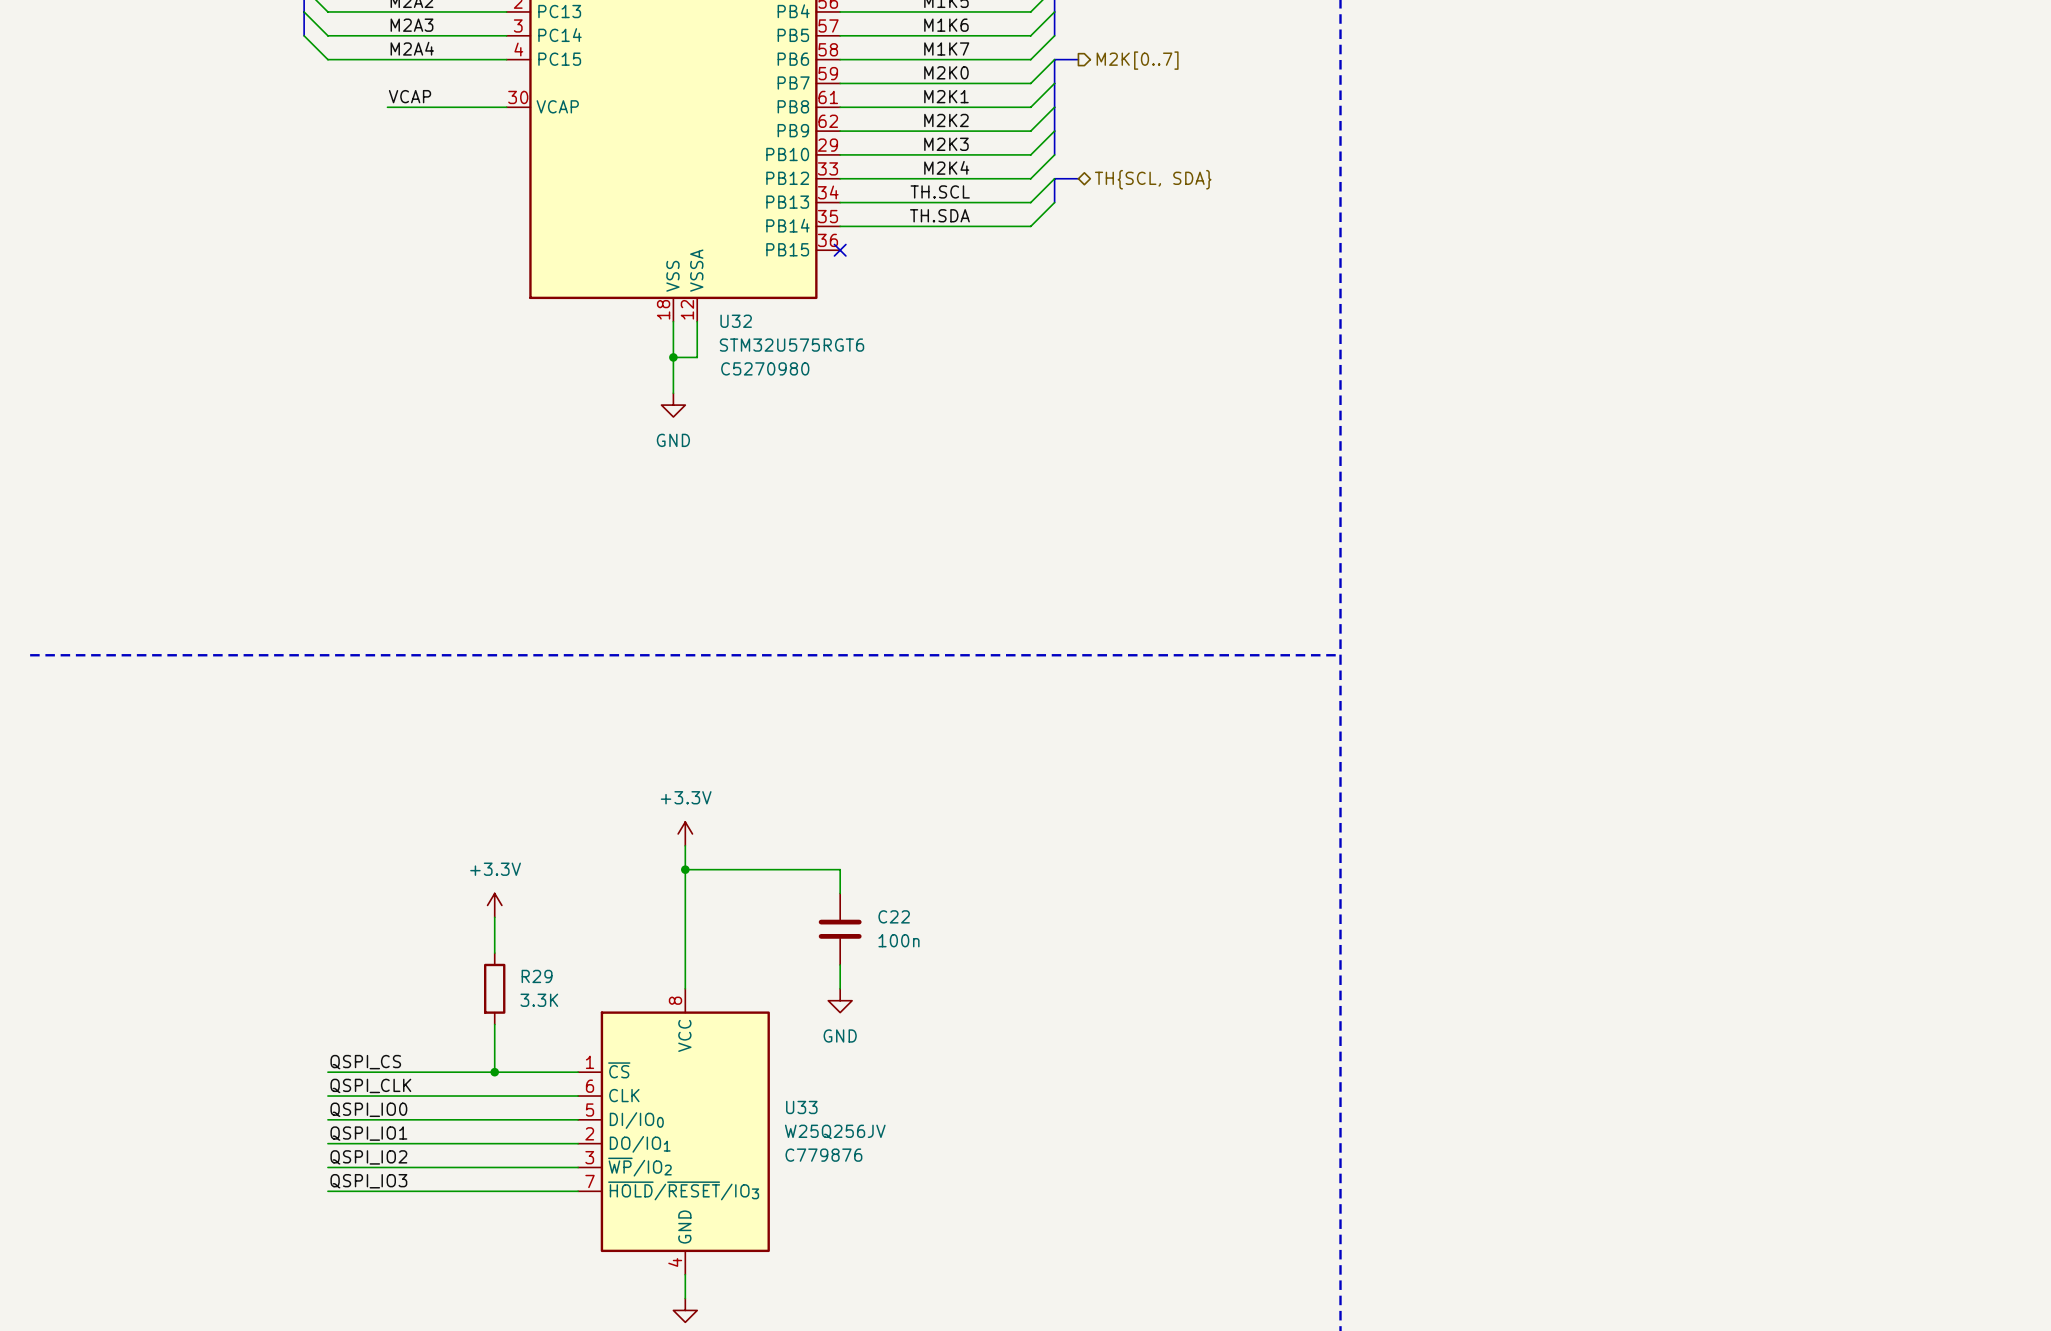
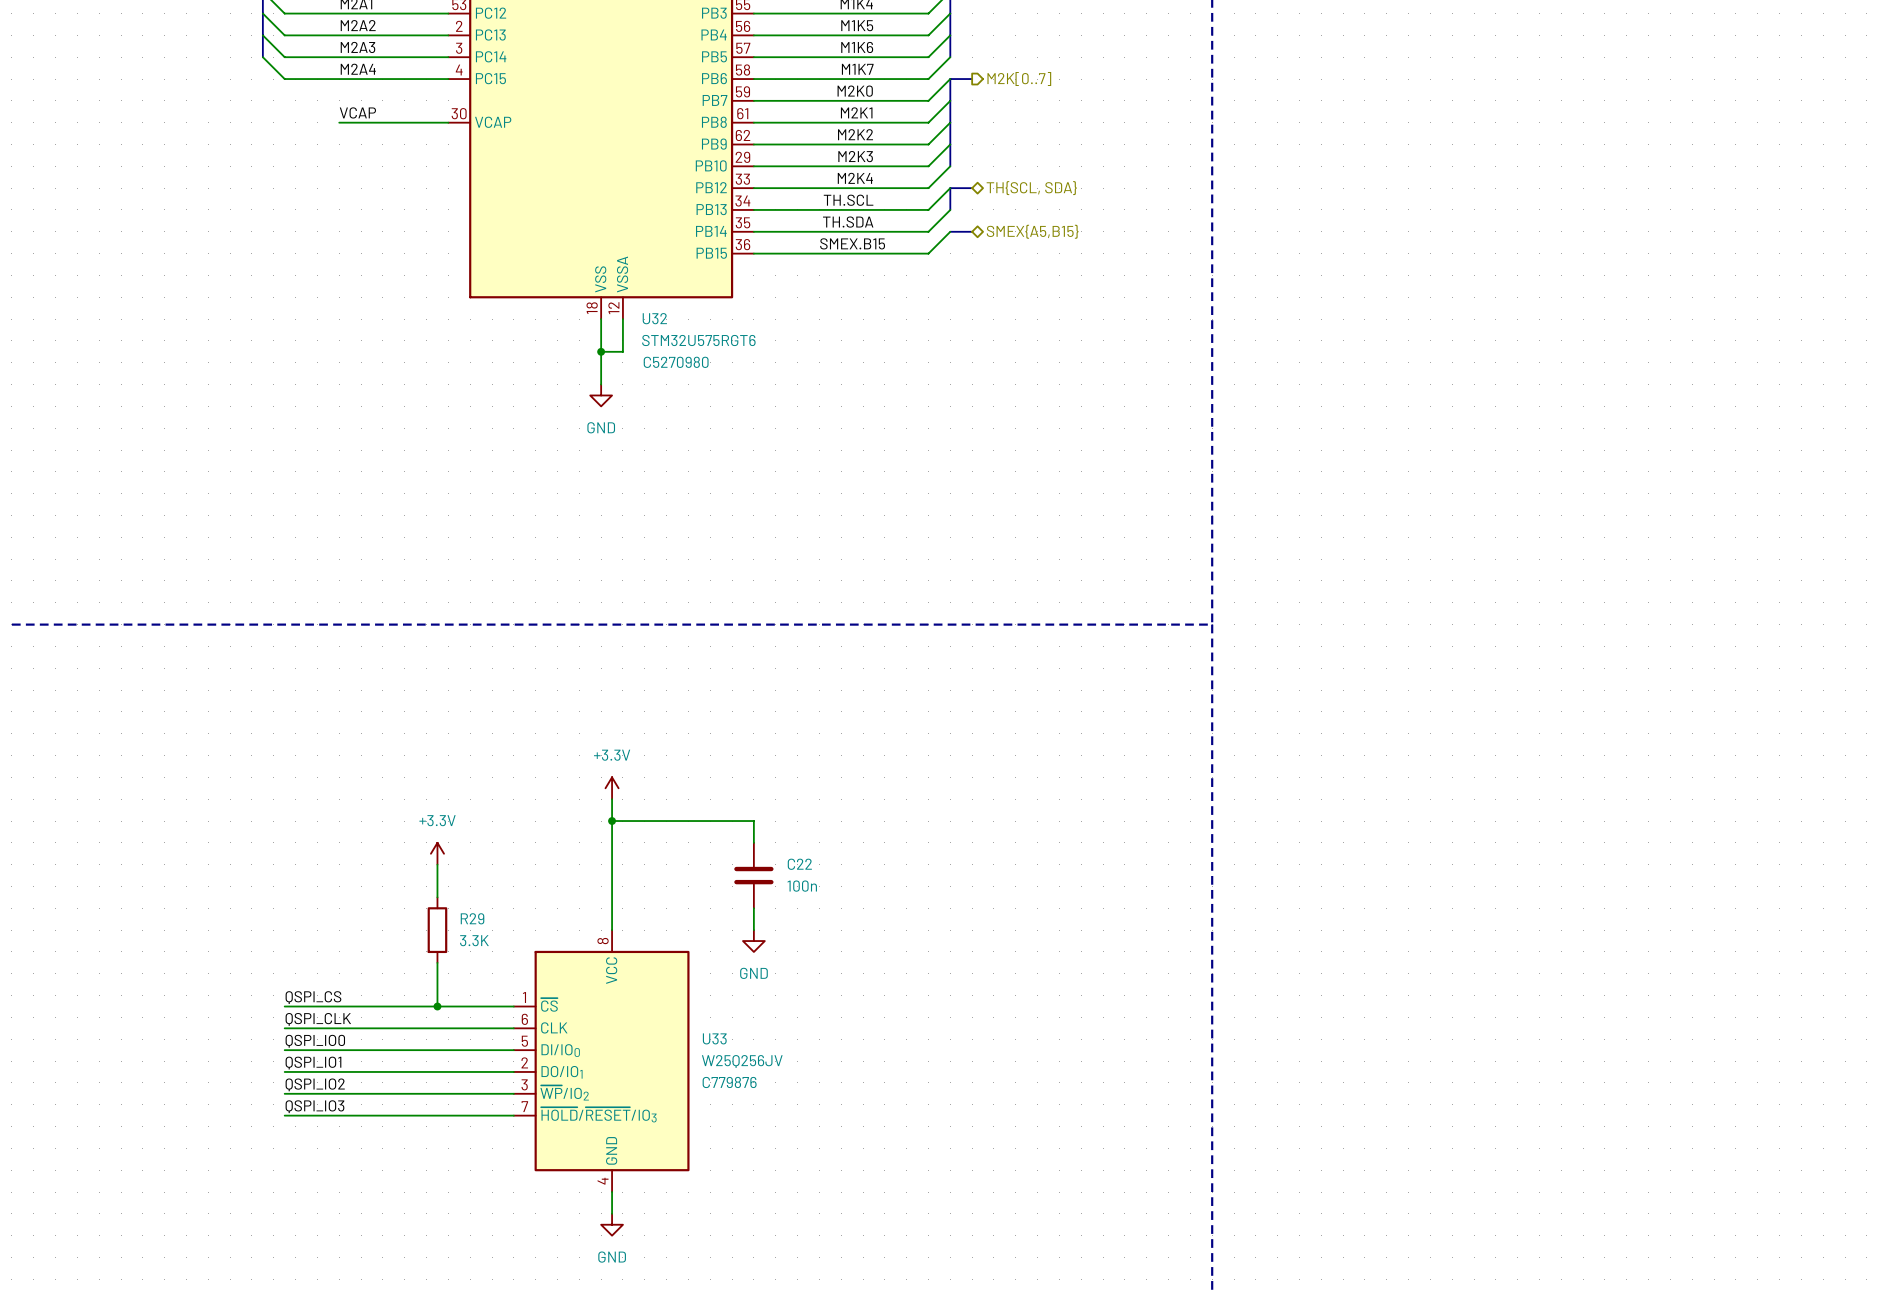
wire: none -> (950, 231) (928, 253) (753, 253)
bus: none -> (950, 231) (972, 231)
hierarchical label: none -> SMEX{A5,B15} (1032, 231)
label: none -> SMEX.B15 (852, 243)
no-connect mark: (840, 250) -> none

